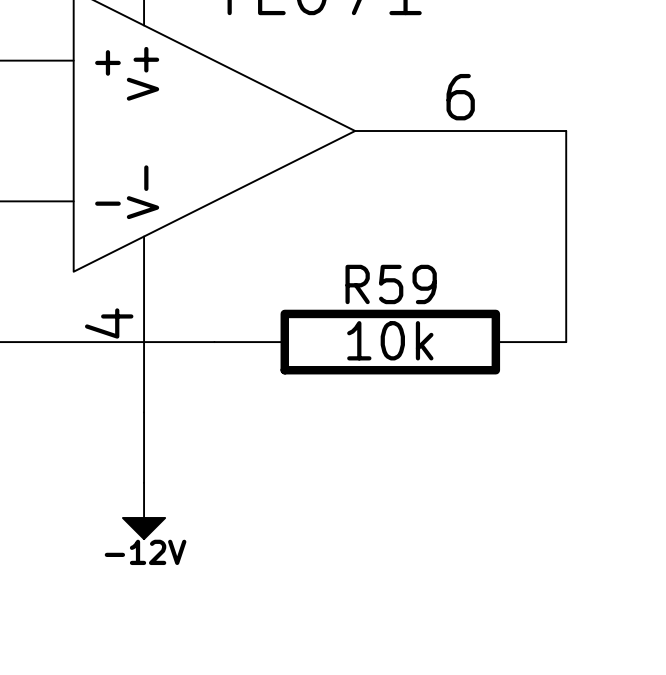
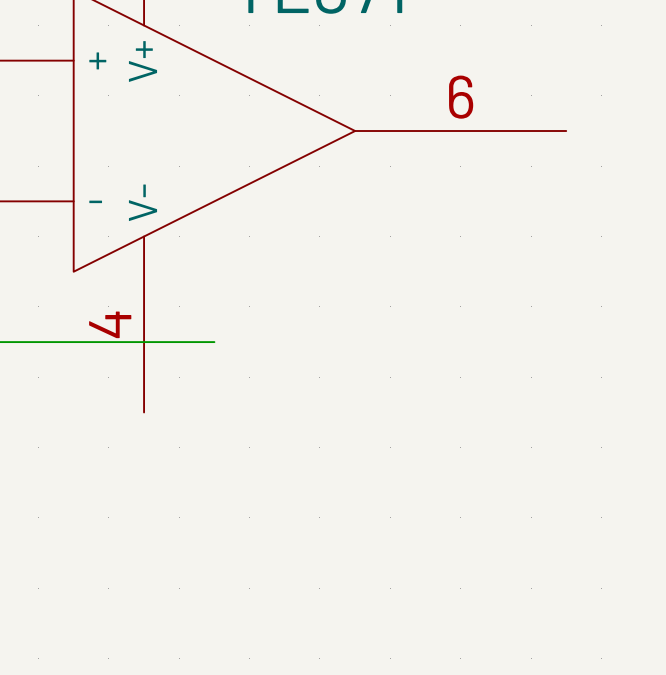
wire: (566, 131) (566, 342) -> none
R59: 10k (390, 342) -> none
wire: (144, 412) (144, 482) -> none
power symbol: -12V (144, 510) -> none

